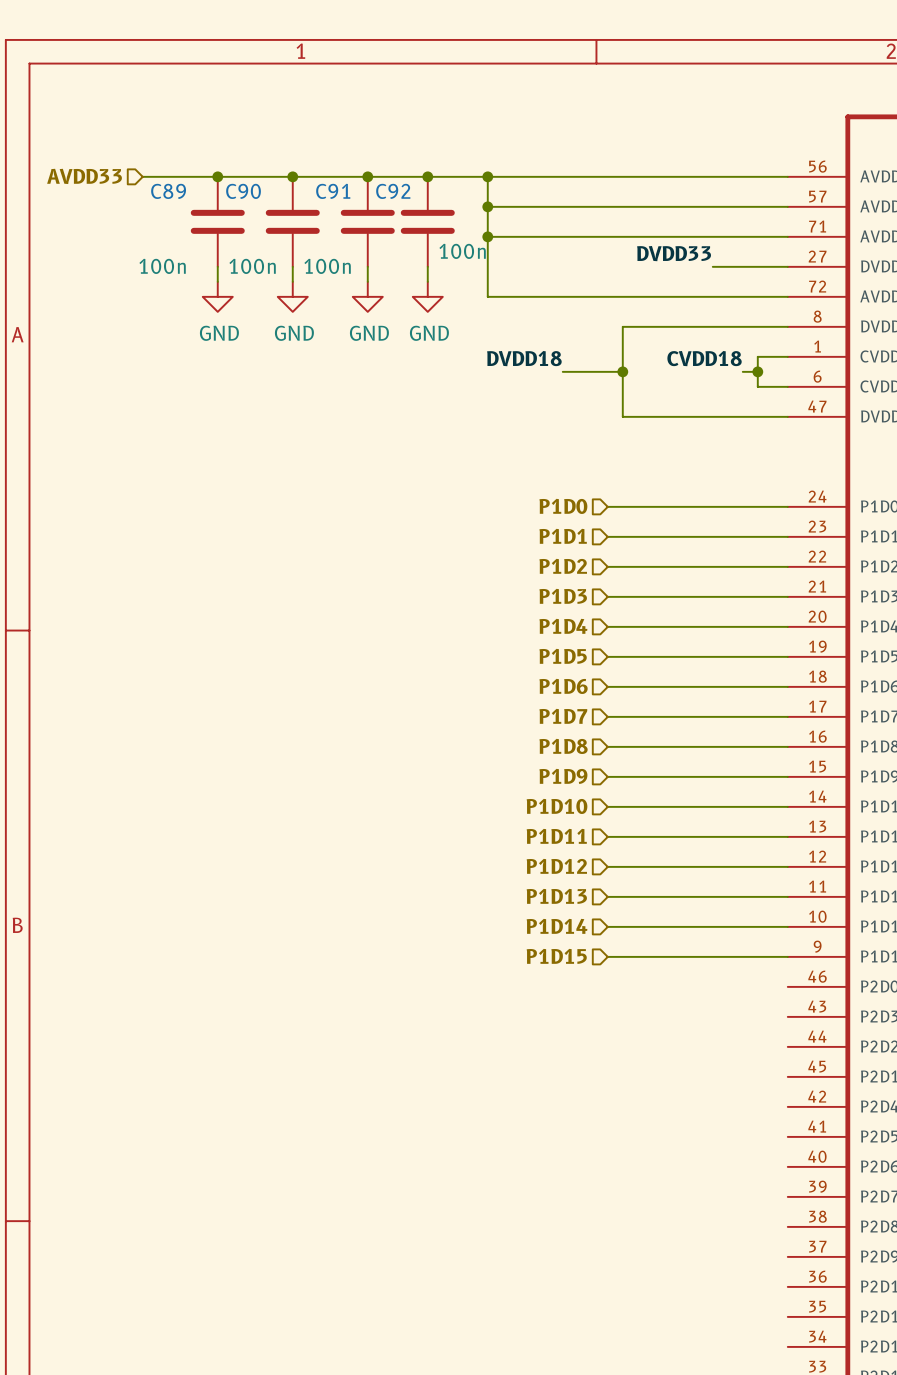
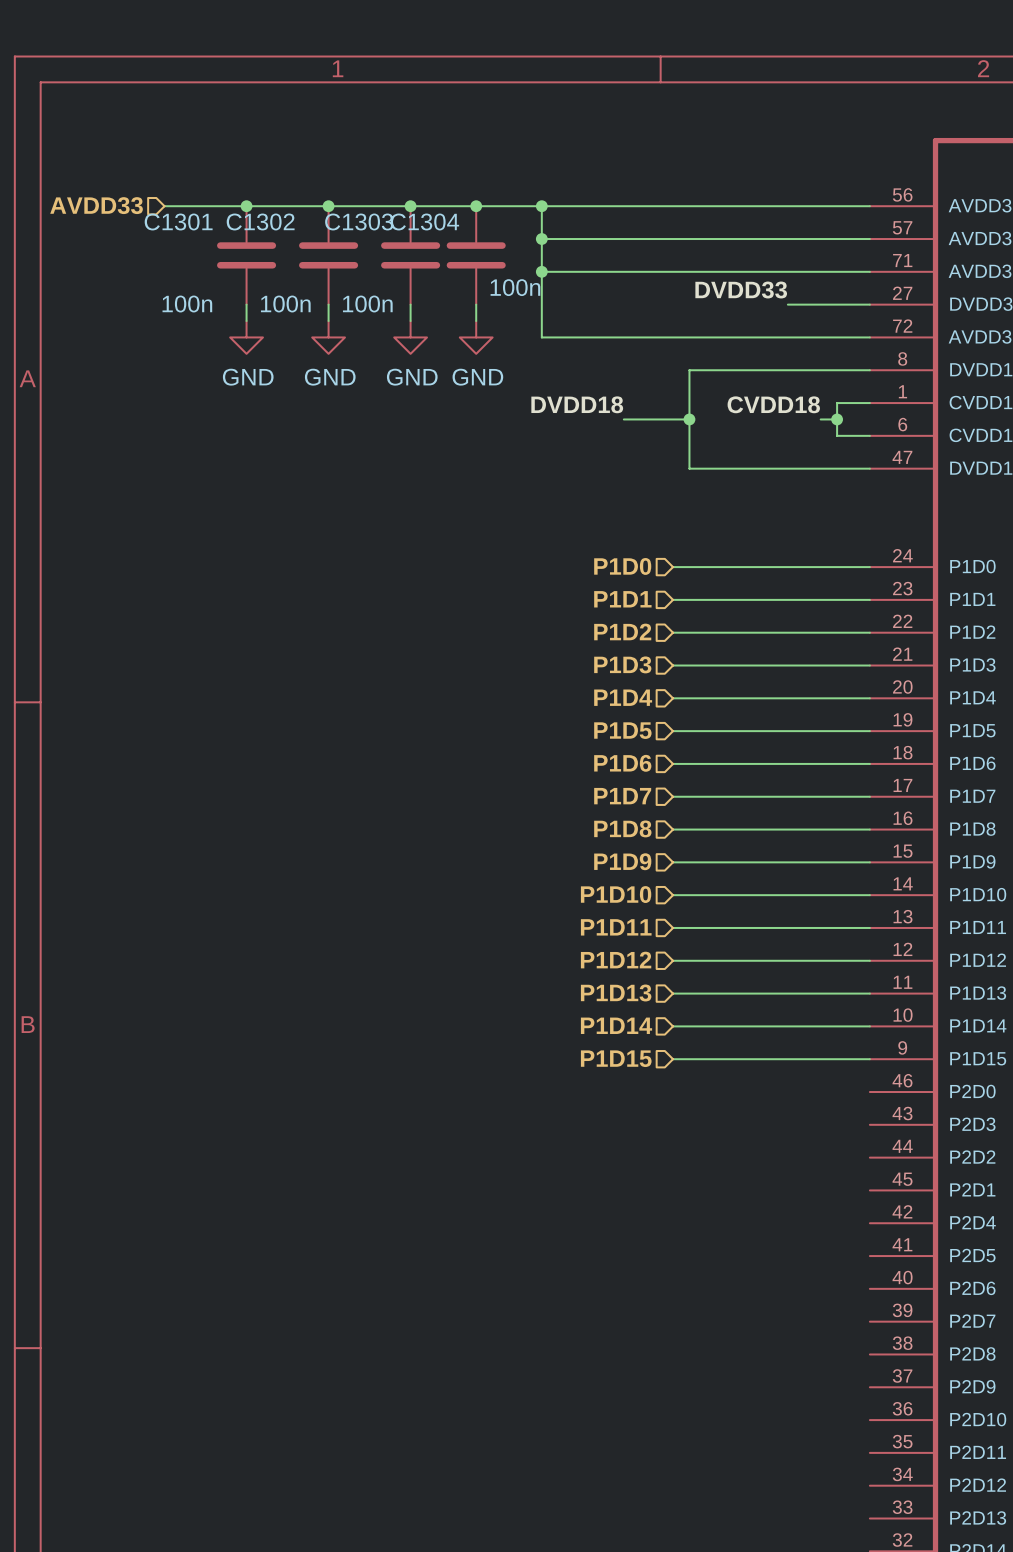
C89 name: C89 (168, 191) -> C1301 (178, 221)
C90 name: C90 (243, 191) -> C1302 (260, 221)
C91 name: C91 (333, 191) -> C1303 (359, 221)
C92 name: C92 (393, 191) -> C1304 (424, 221)

